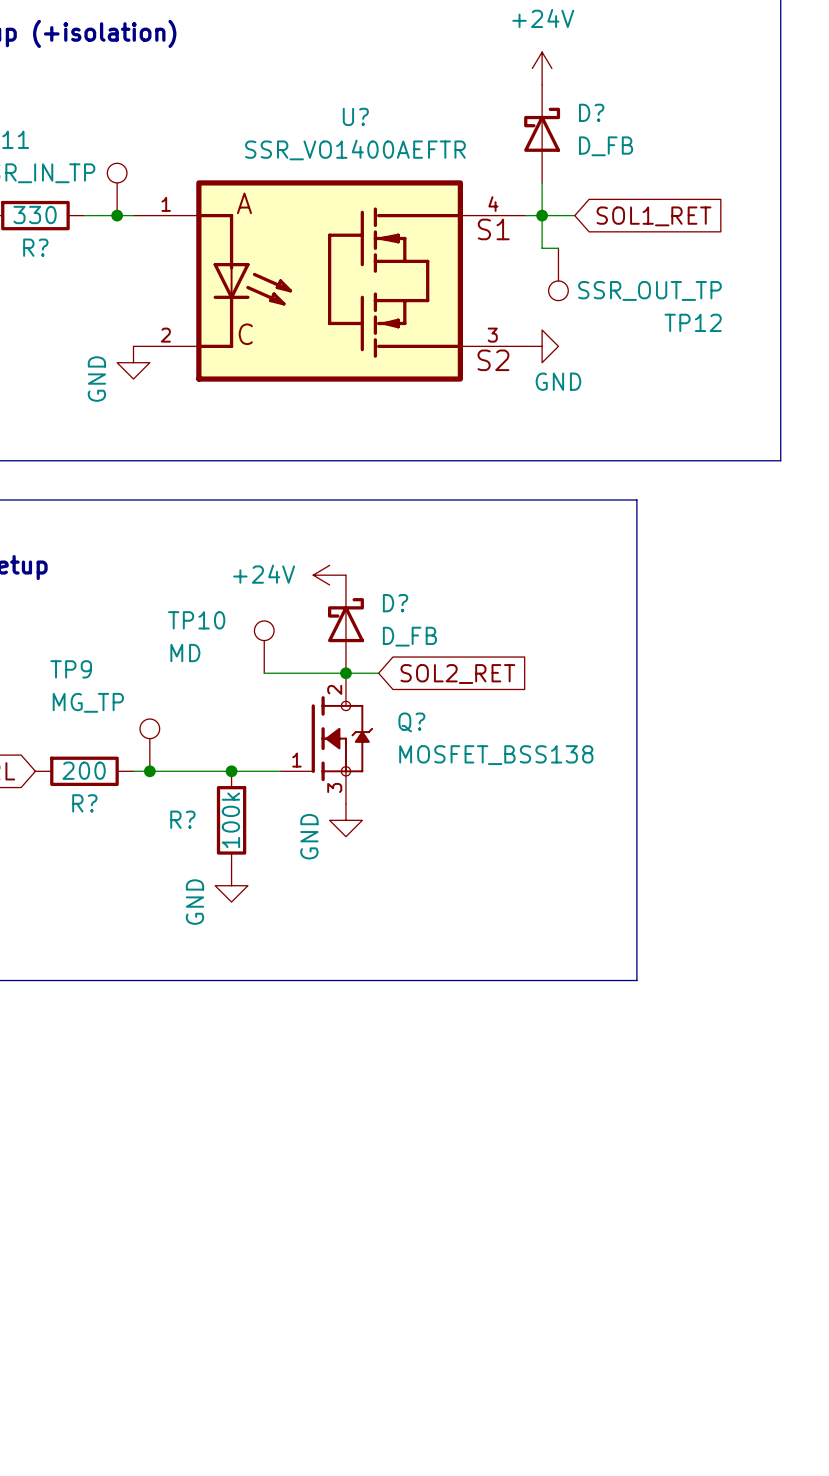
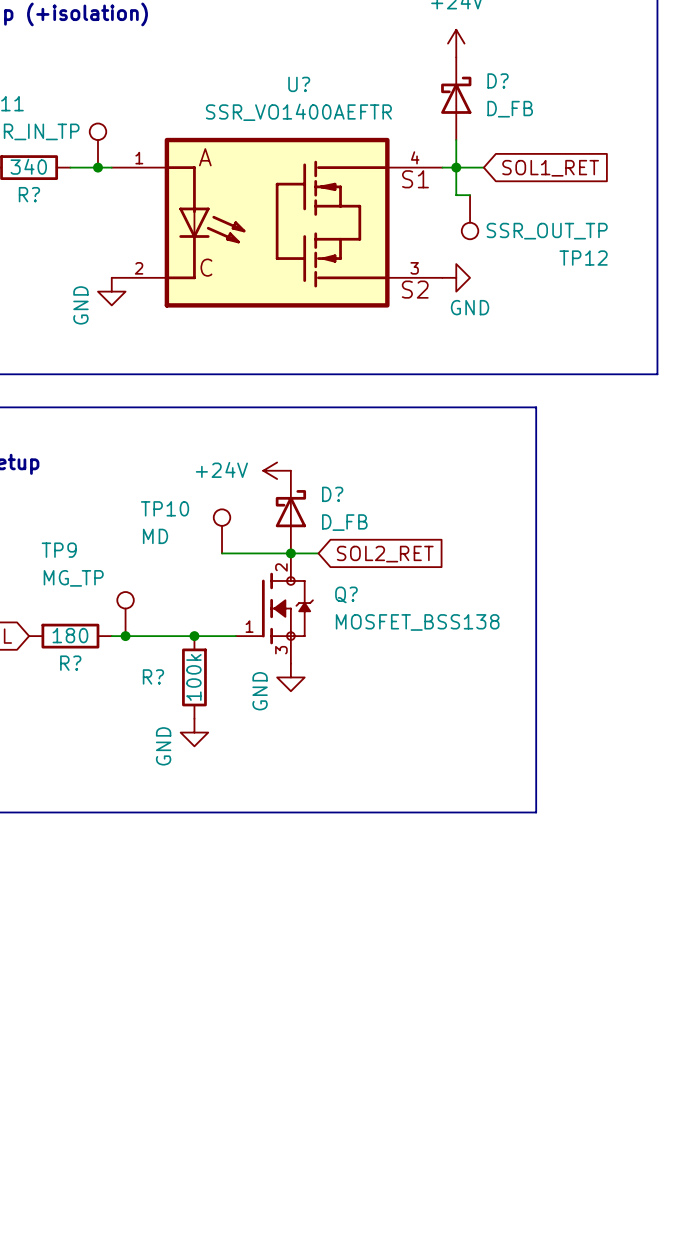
R? value: 330 (35, 214) -> 340 (28, 166)
R? value: 200 (84, 770) -> 180 (70, 635)

